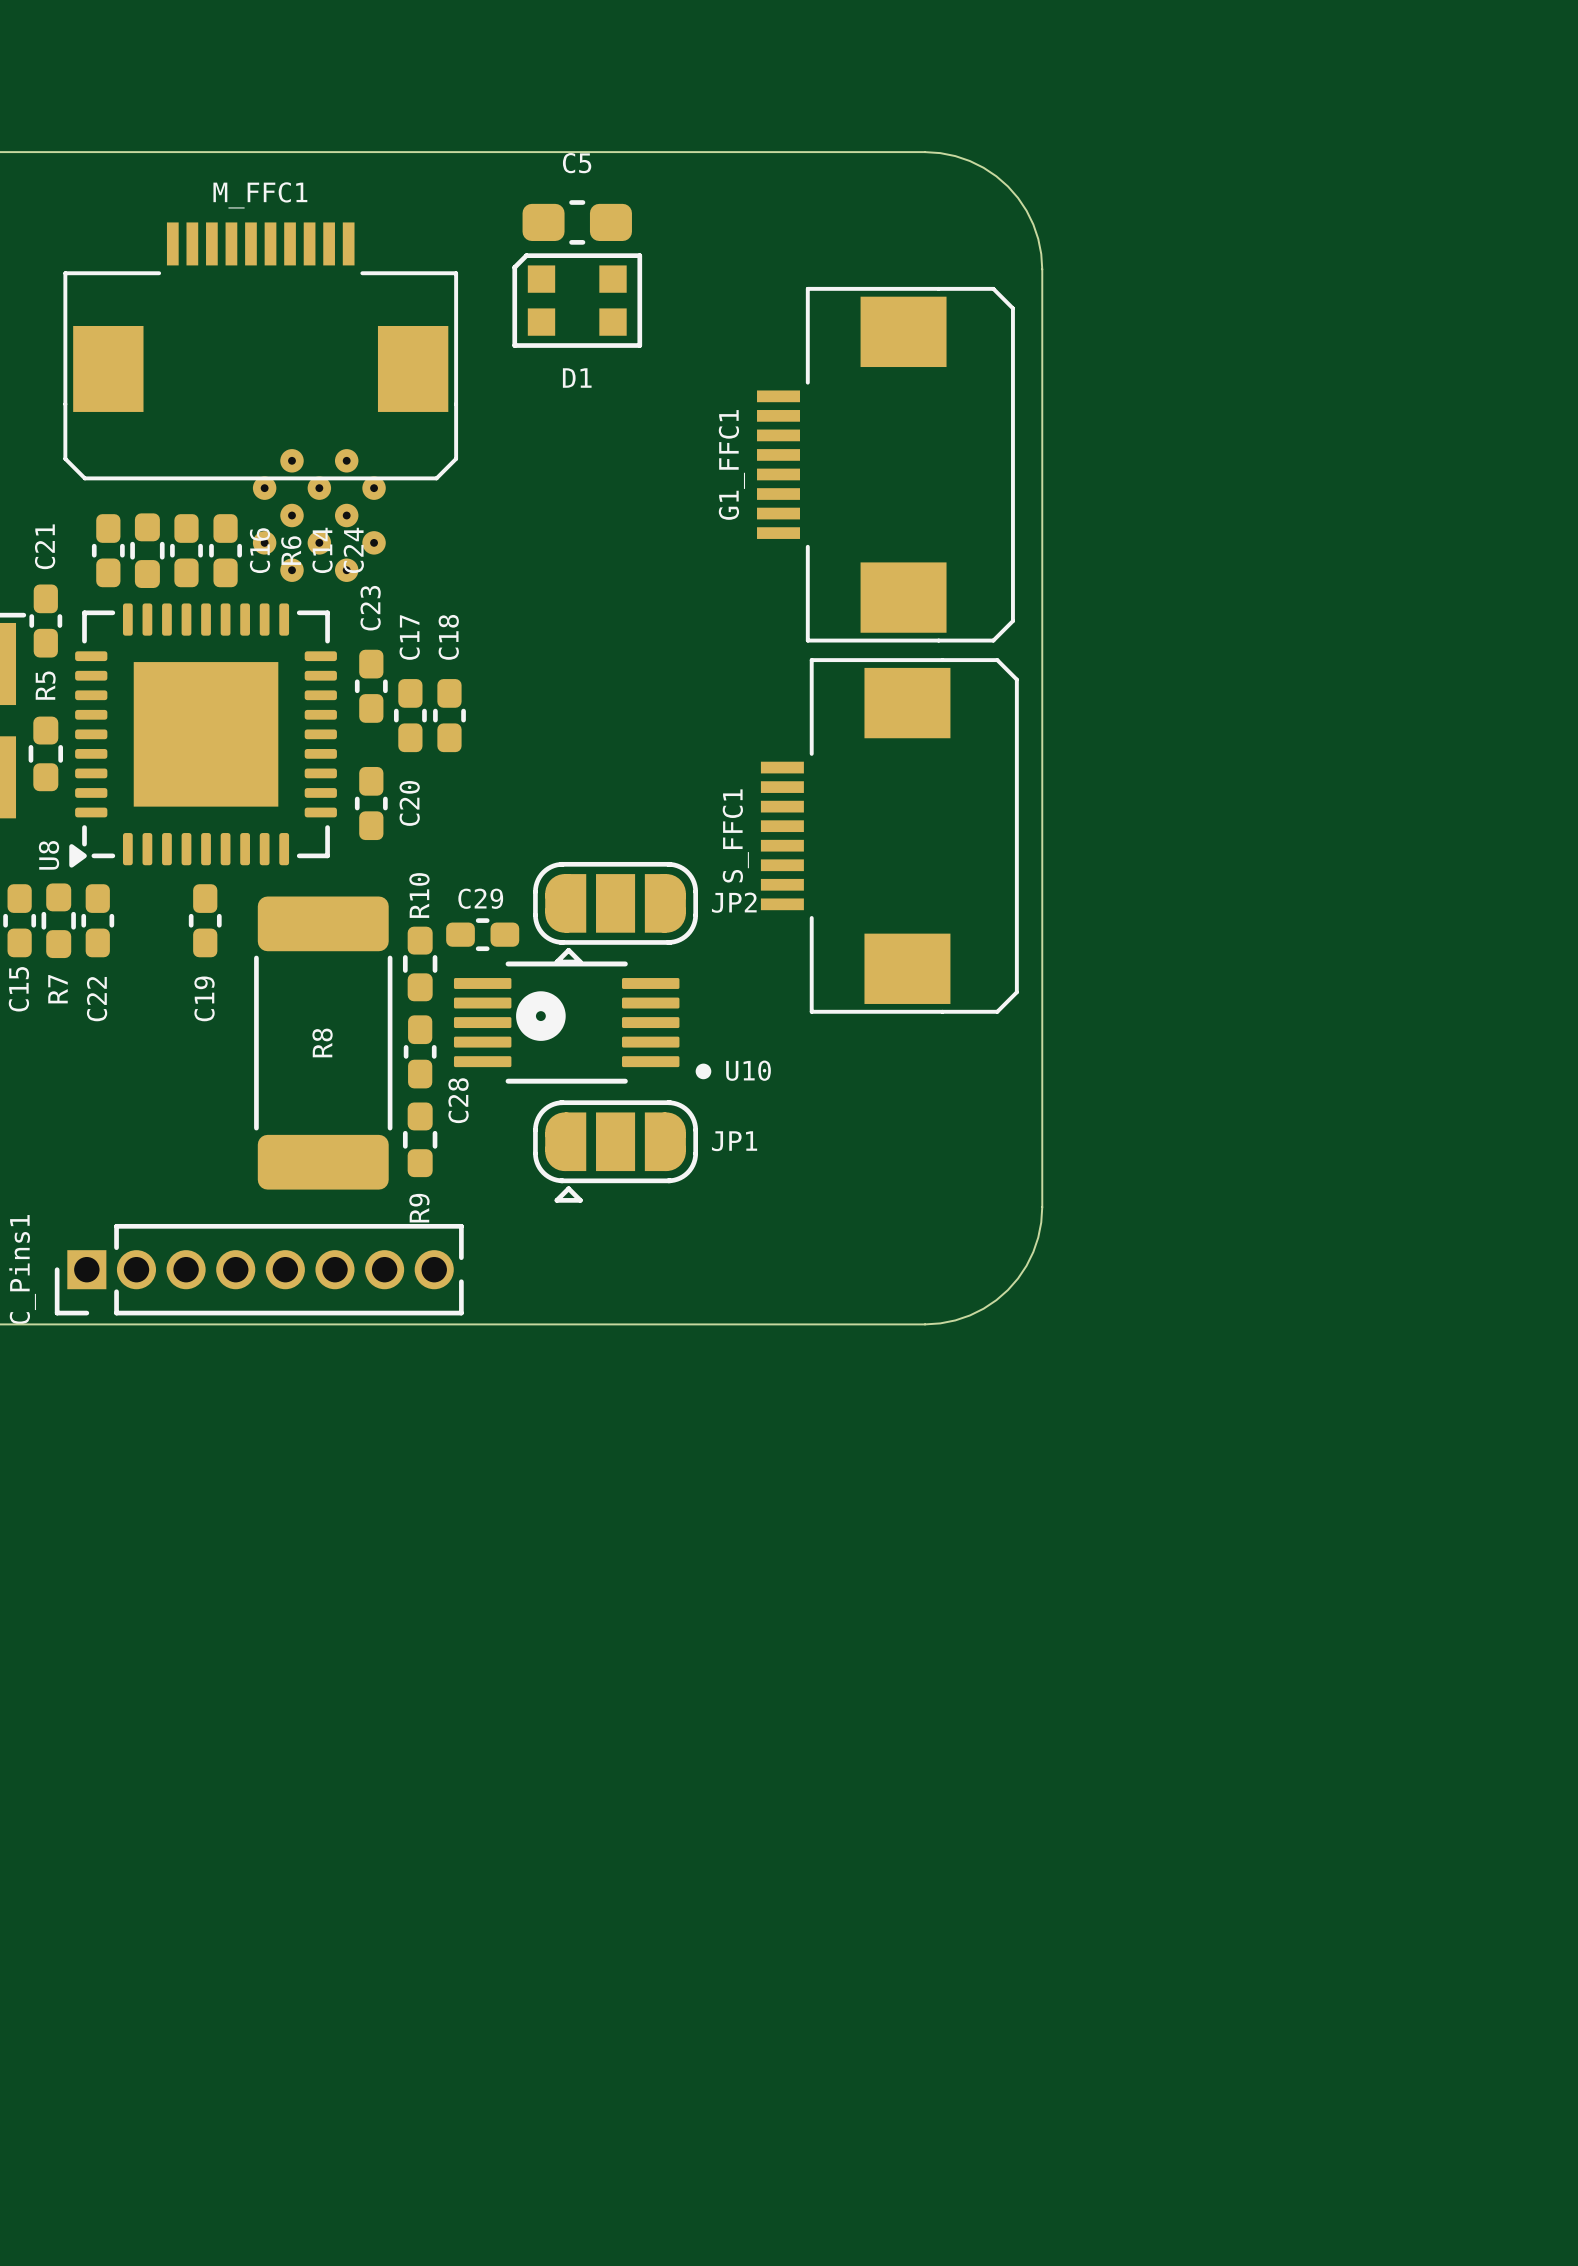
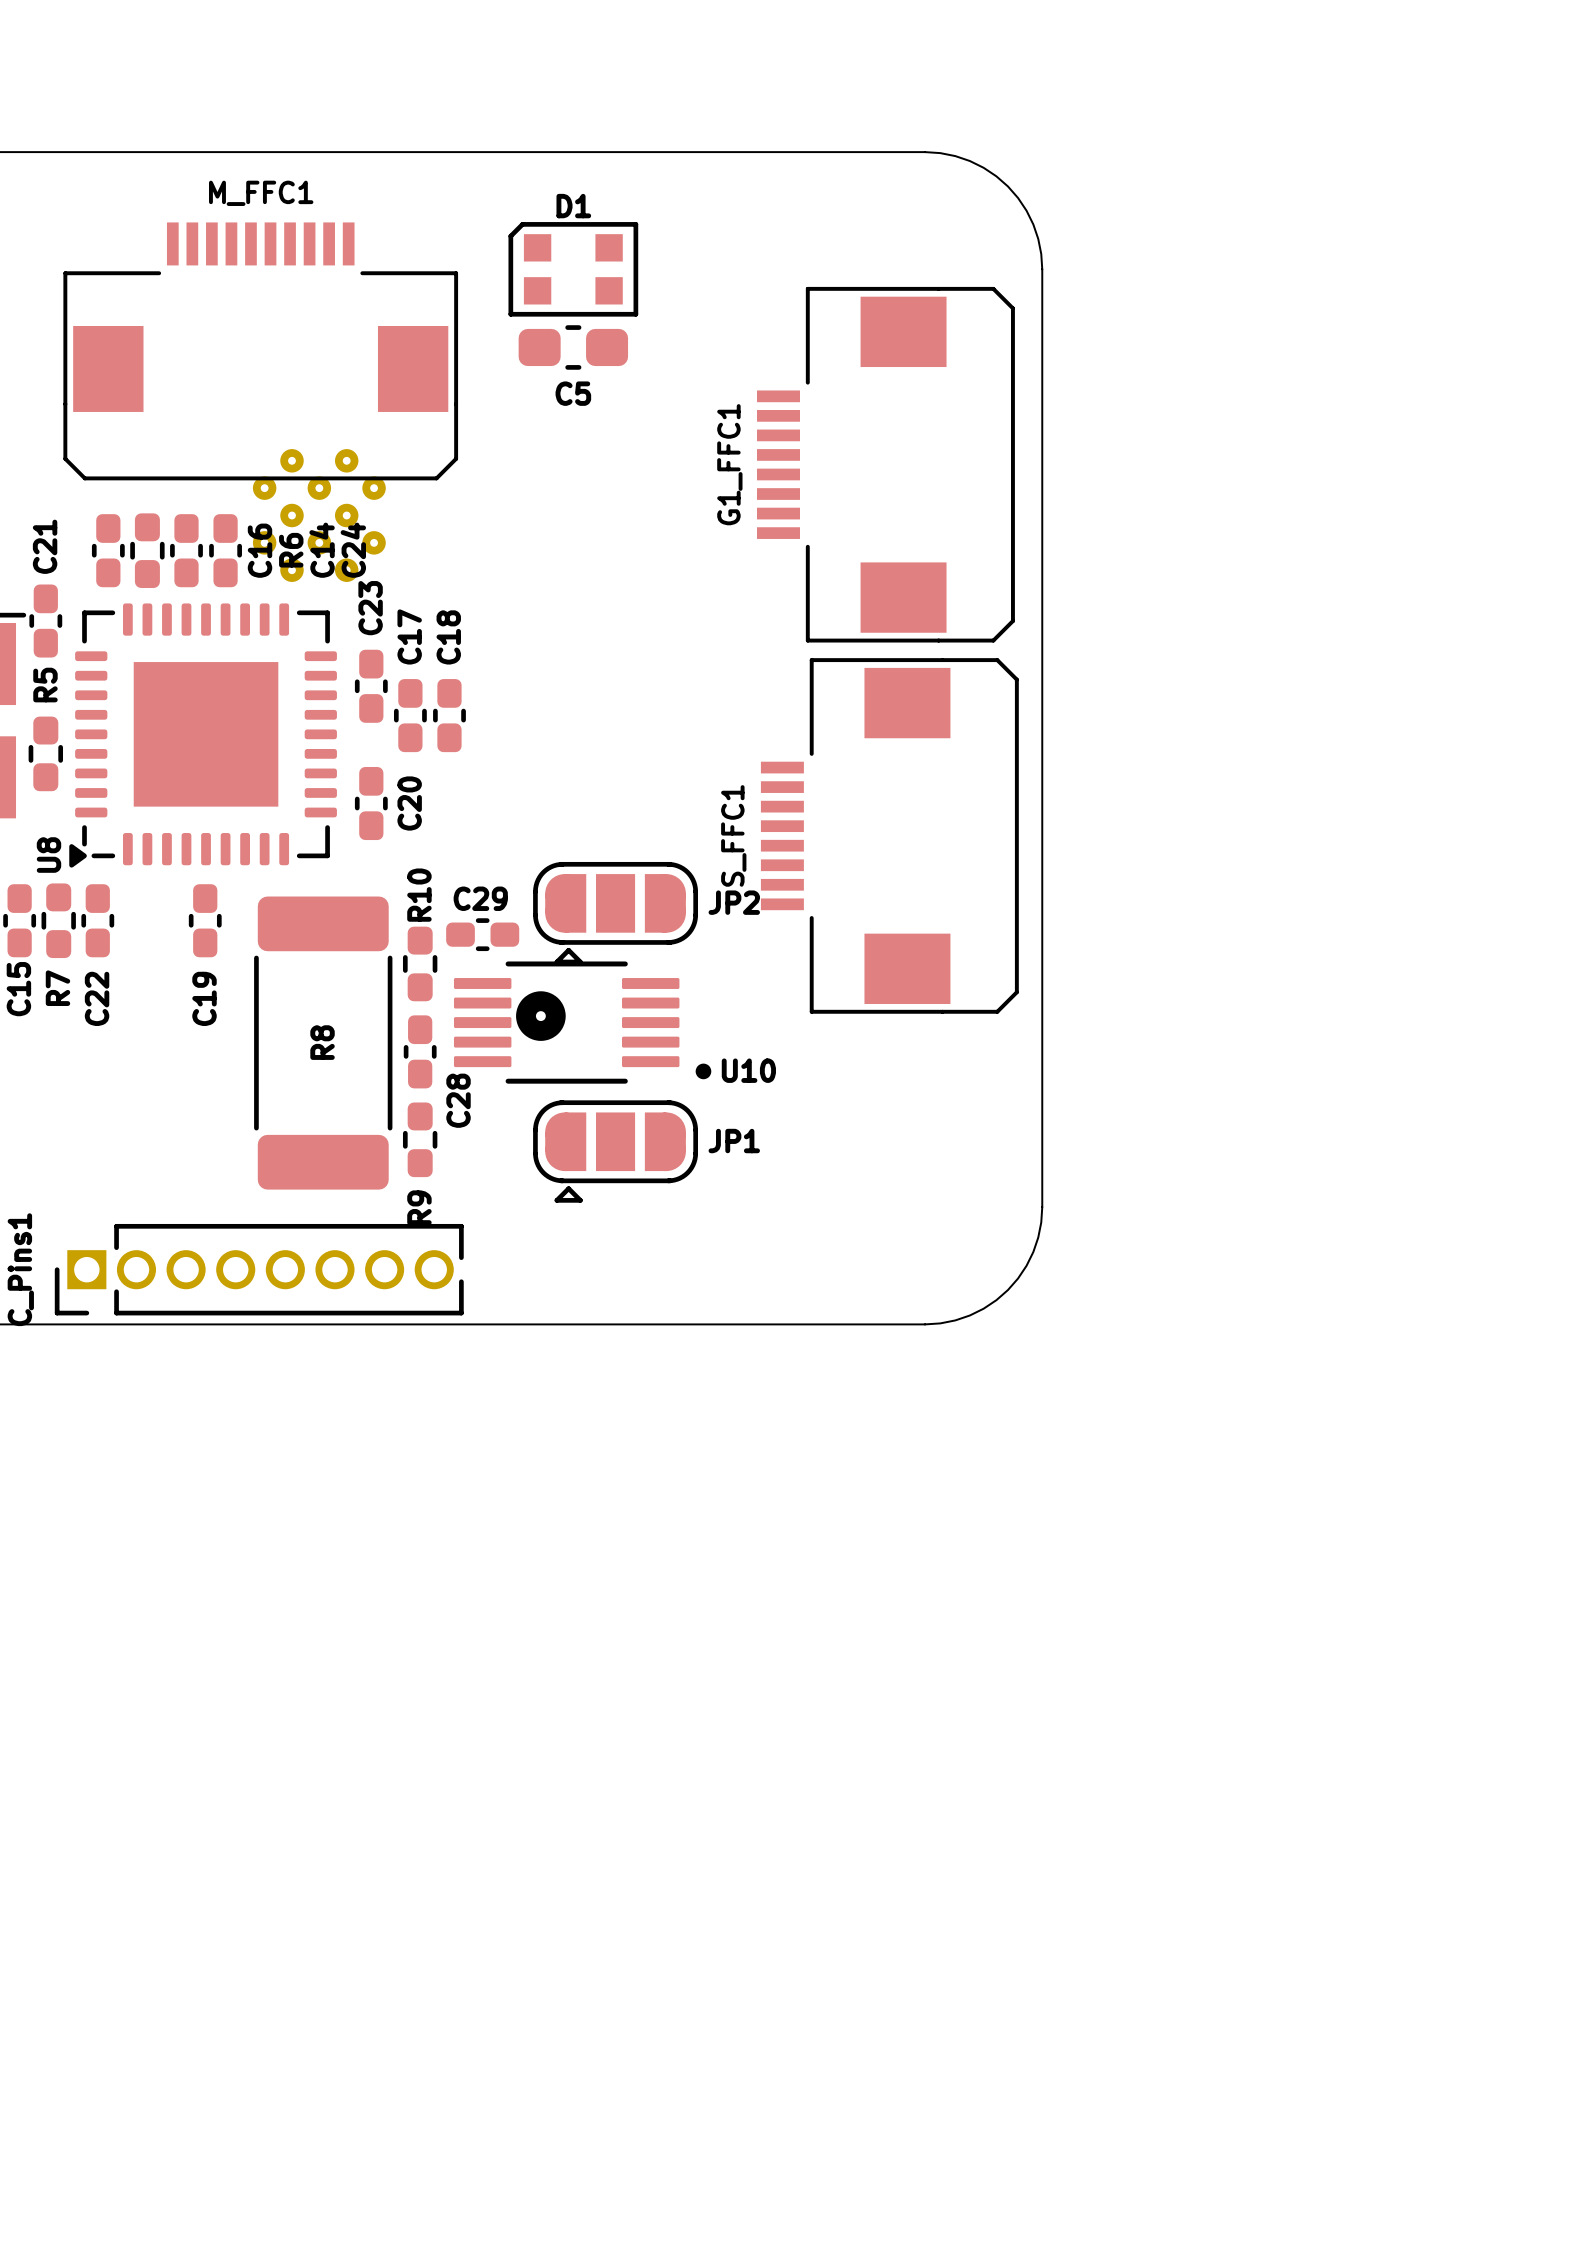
C5 name position: C5 (577, 163) -> C5 (573, 393)
C5 position: (577, 222) -> (573, 347)
D1 position: (577, 300) -> (573, 269)
D1 name position: D1 (577, 378) -> D1 (573, 206)

